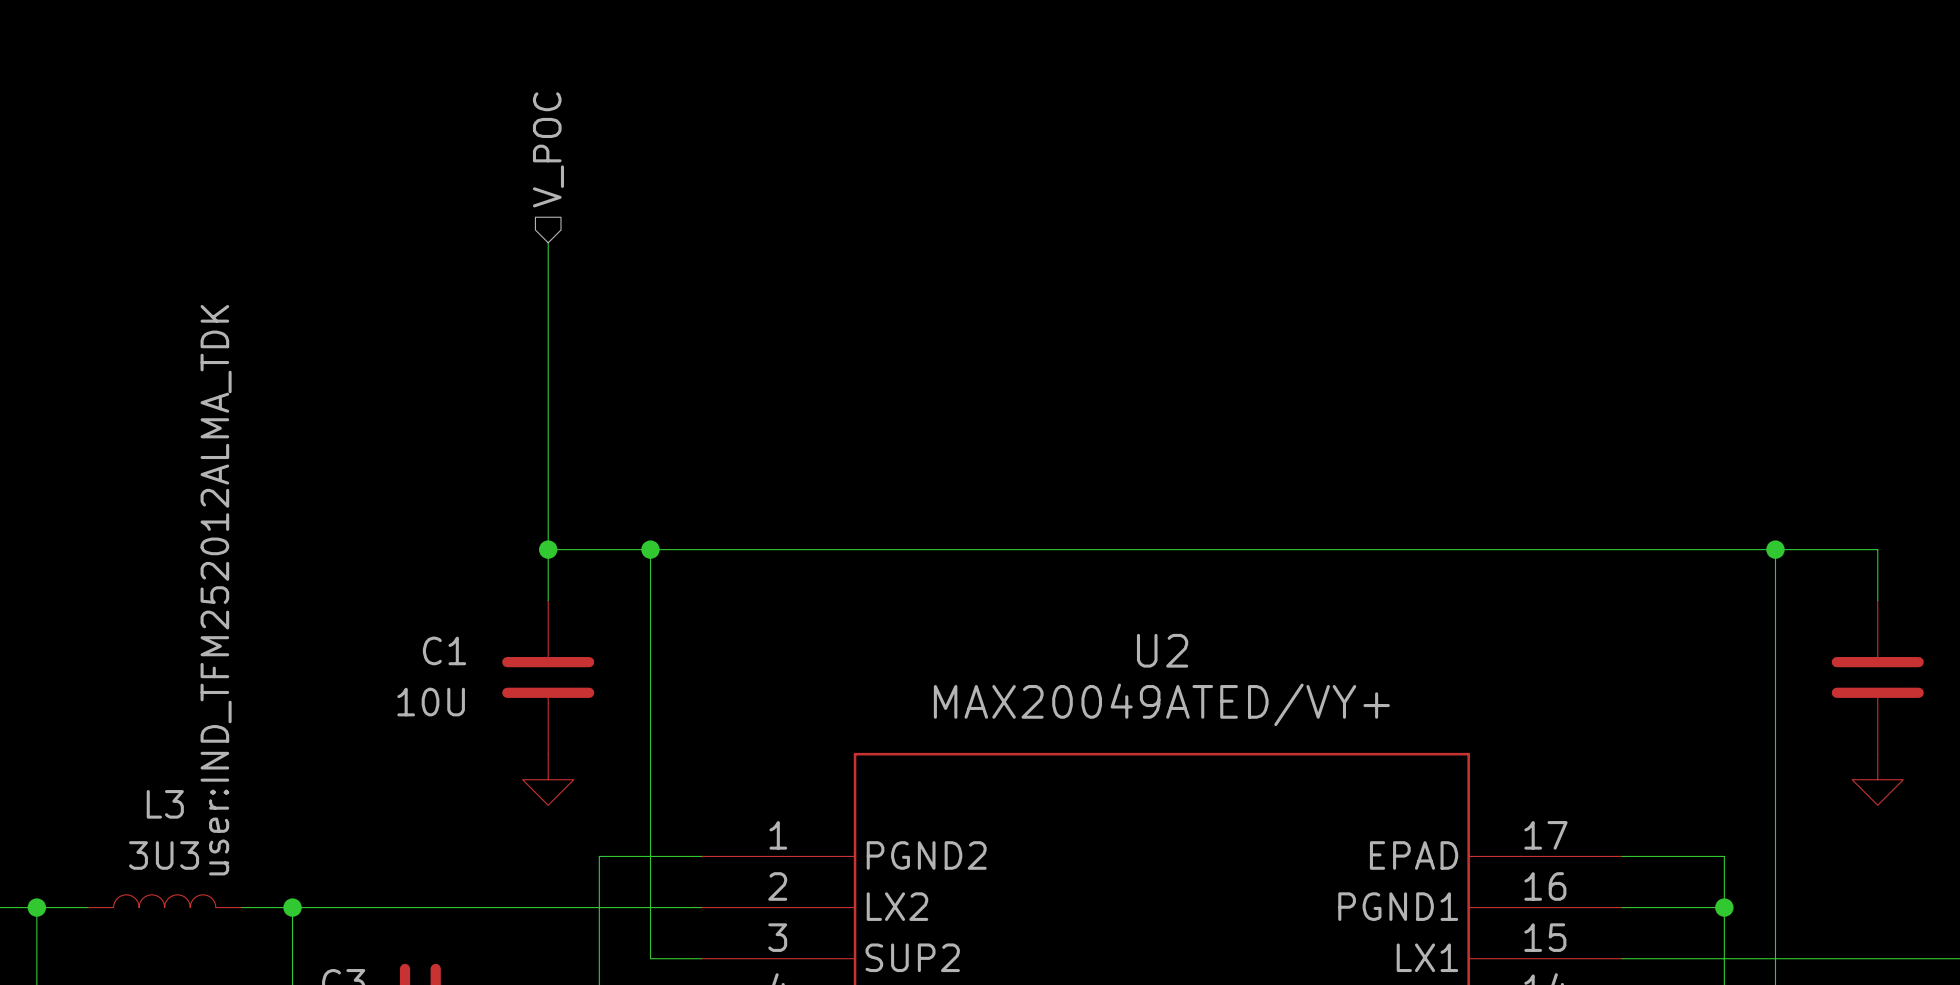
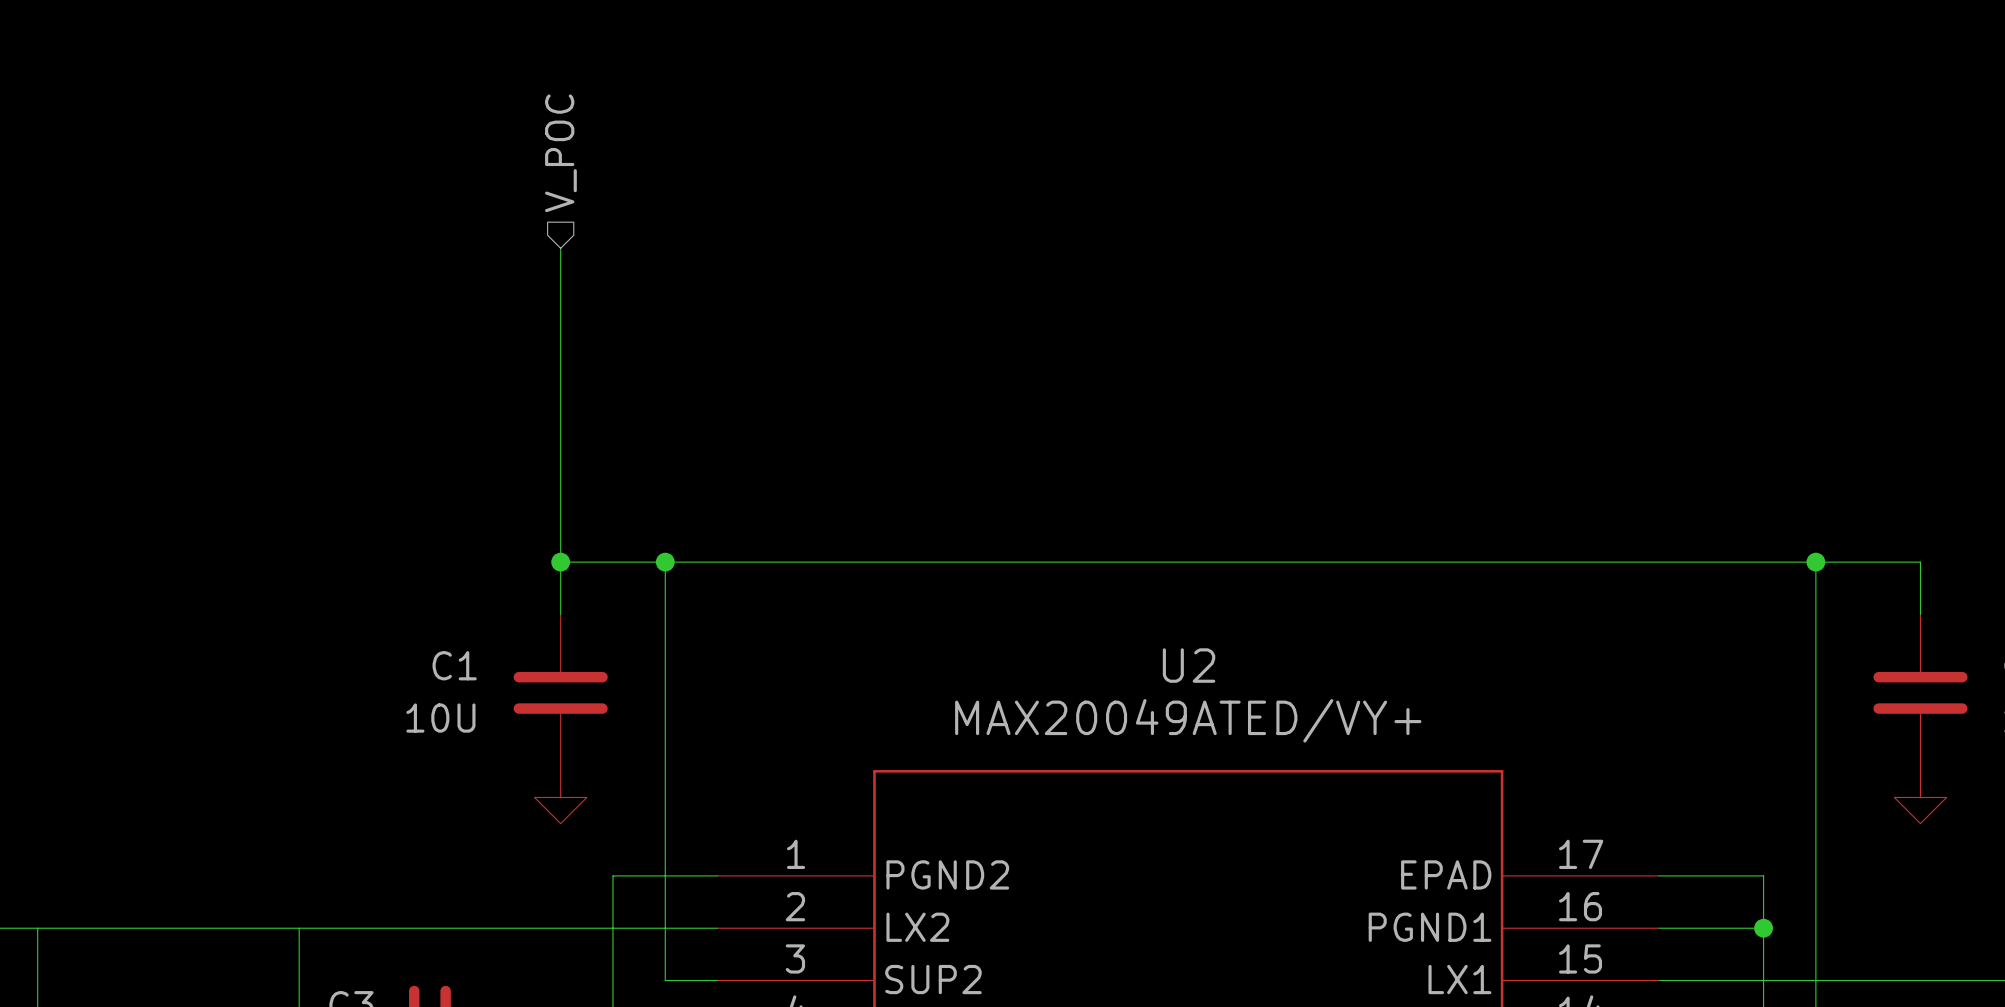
L3: 3U3 (164, 901) -> none
junction: (36, 907) -> none
wire: none -> (89, 928) (246, 928)
junction: (292, 907) -> none

